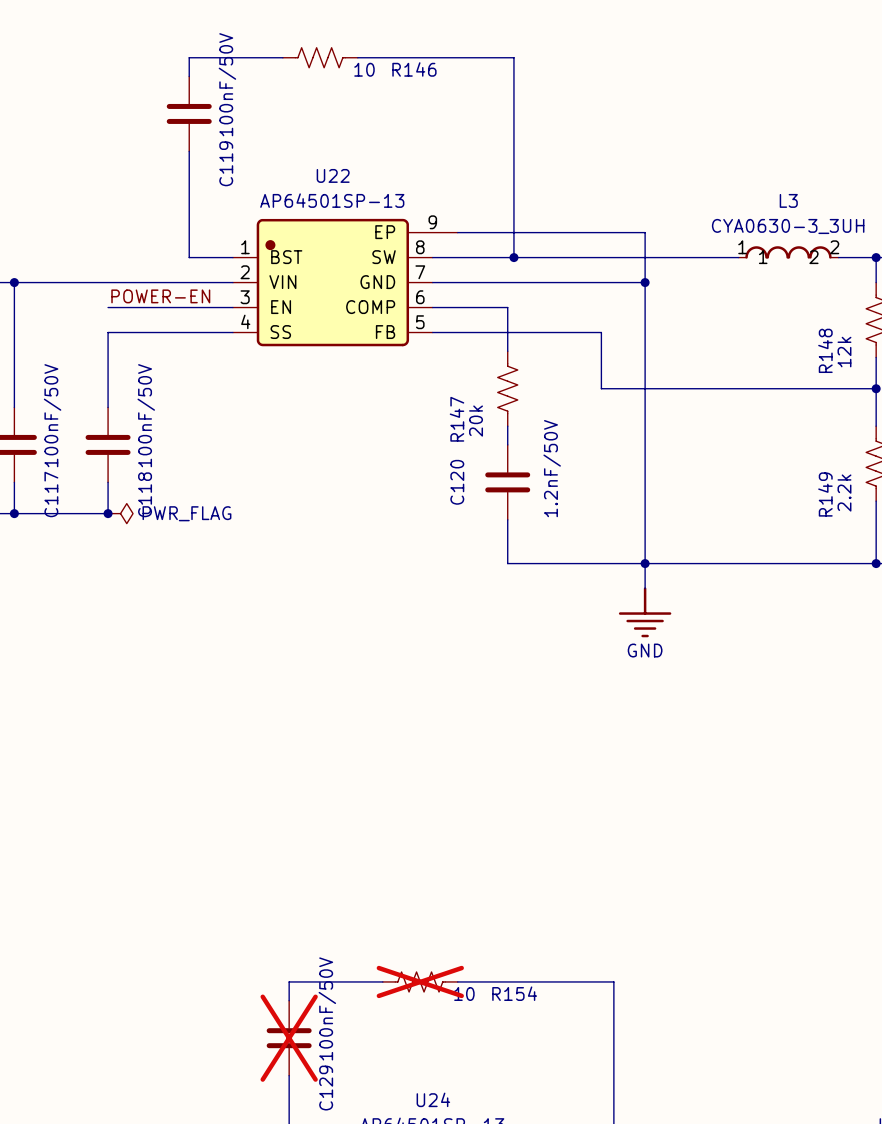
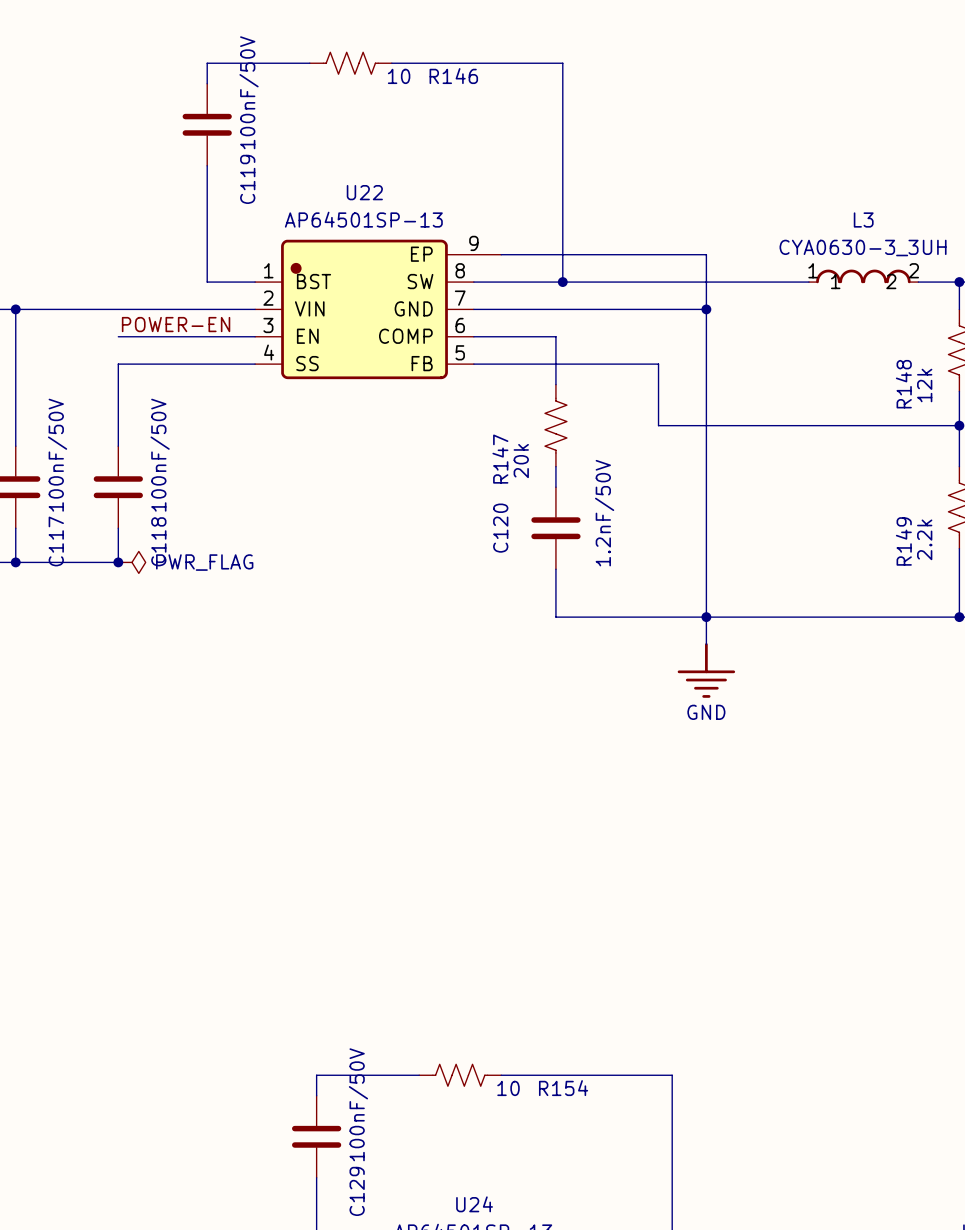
R154 do-not-place cross: (420, 981) -> none
C129 do-not-place cross: (289, 1038) -> none

